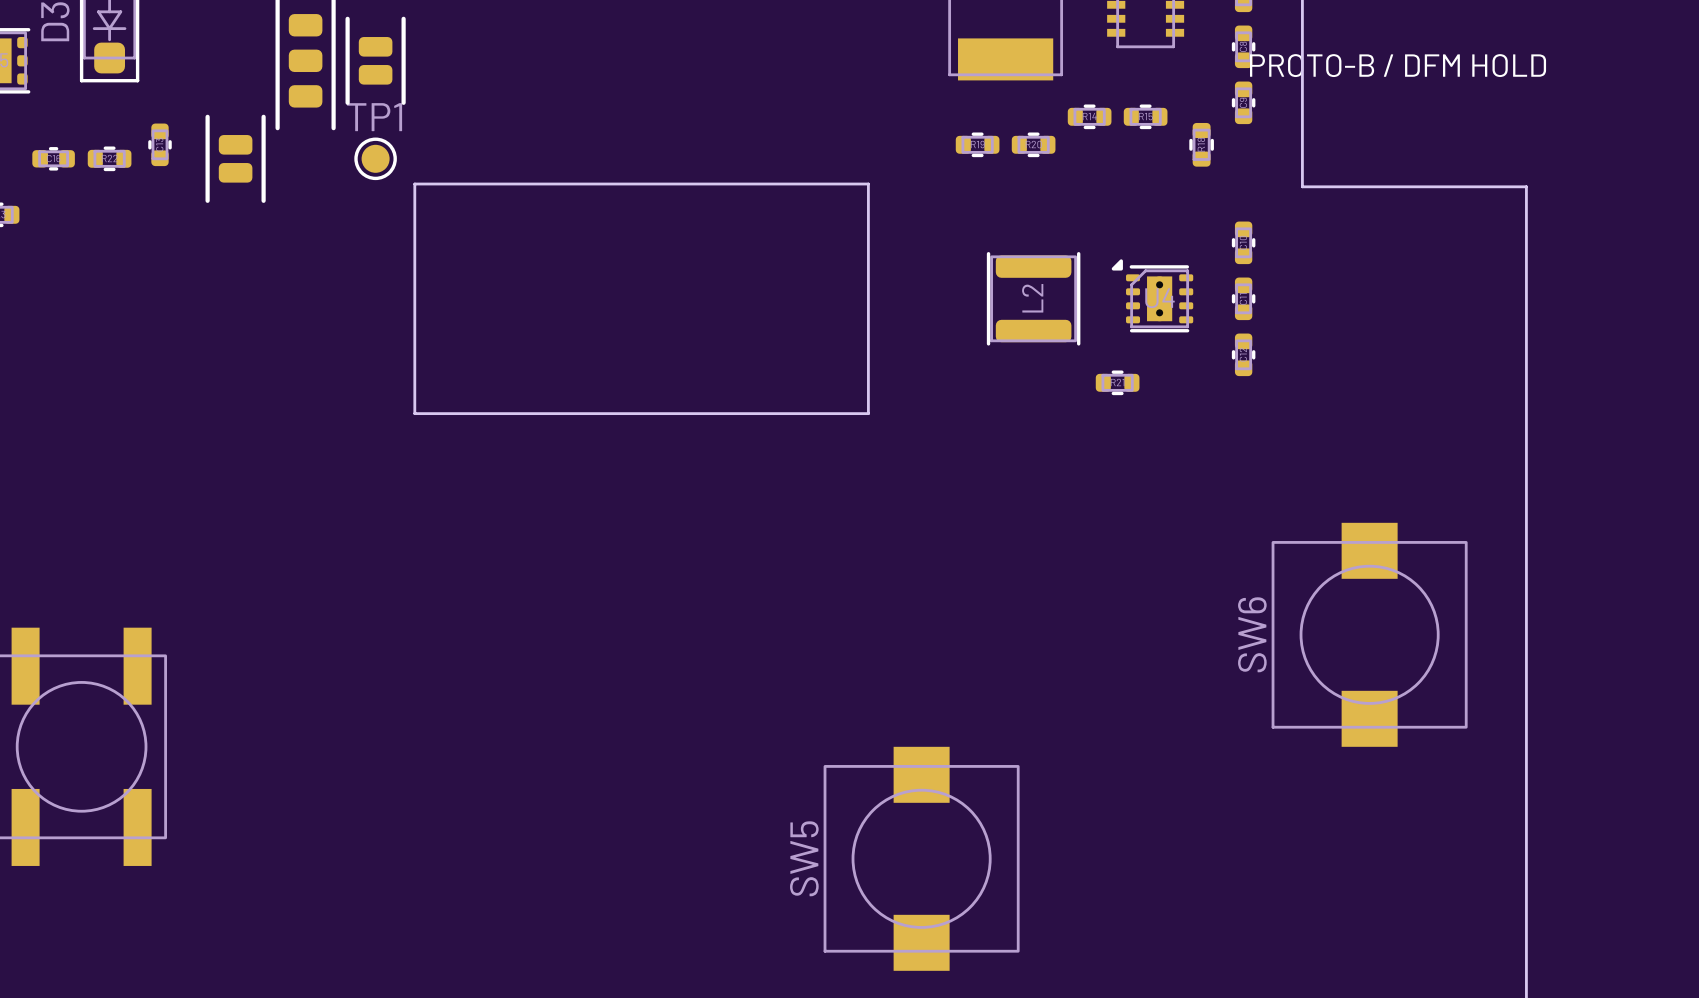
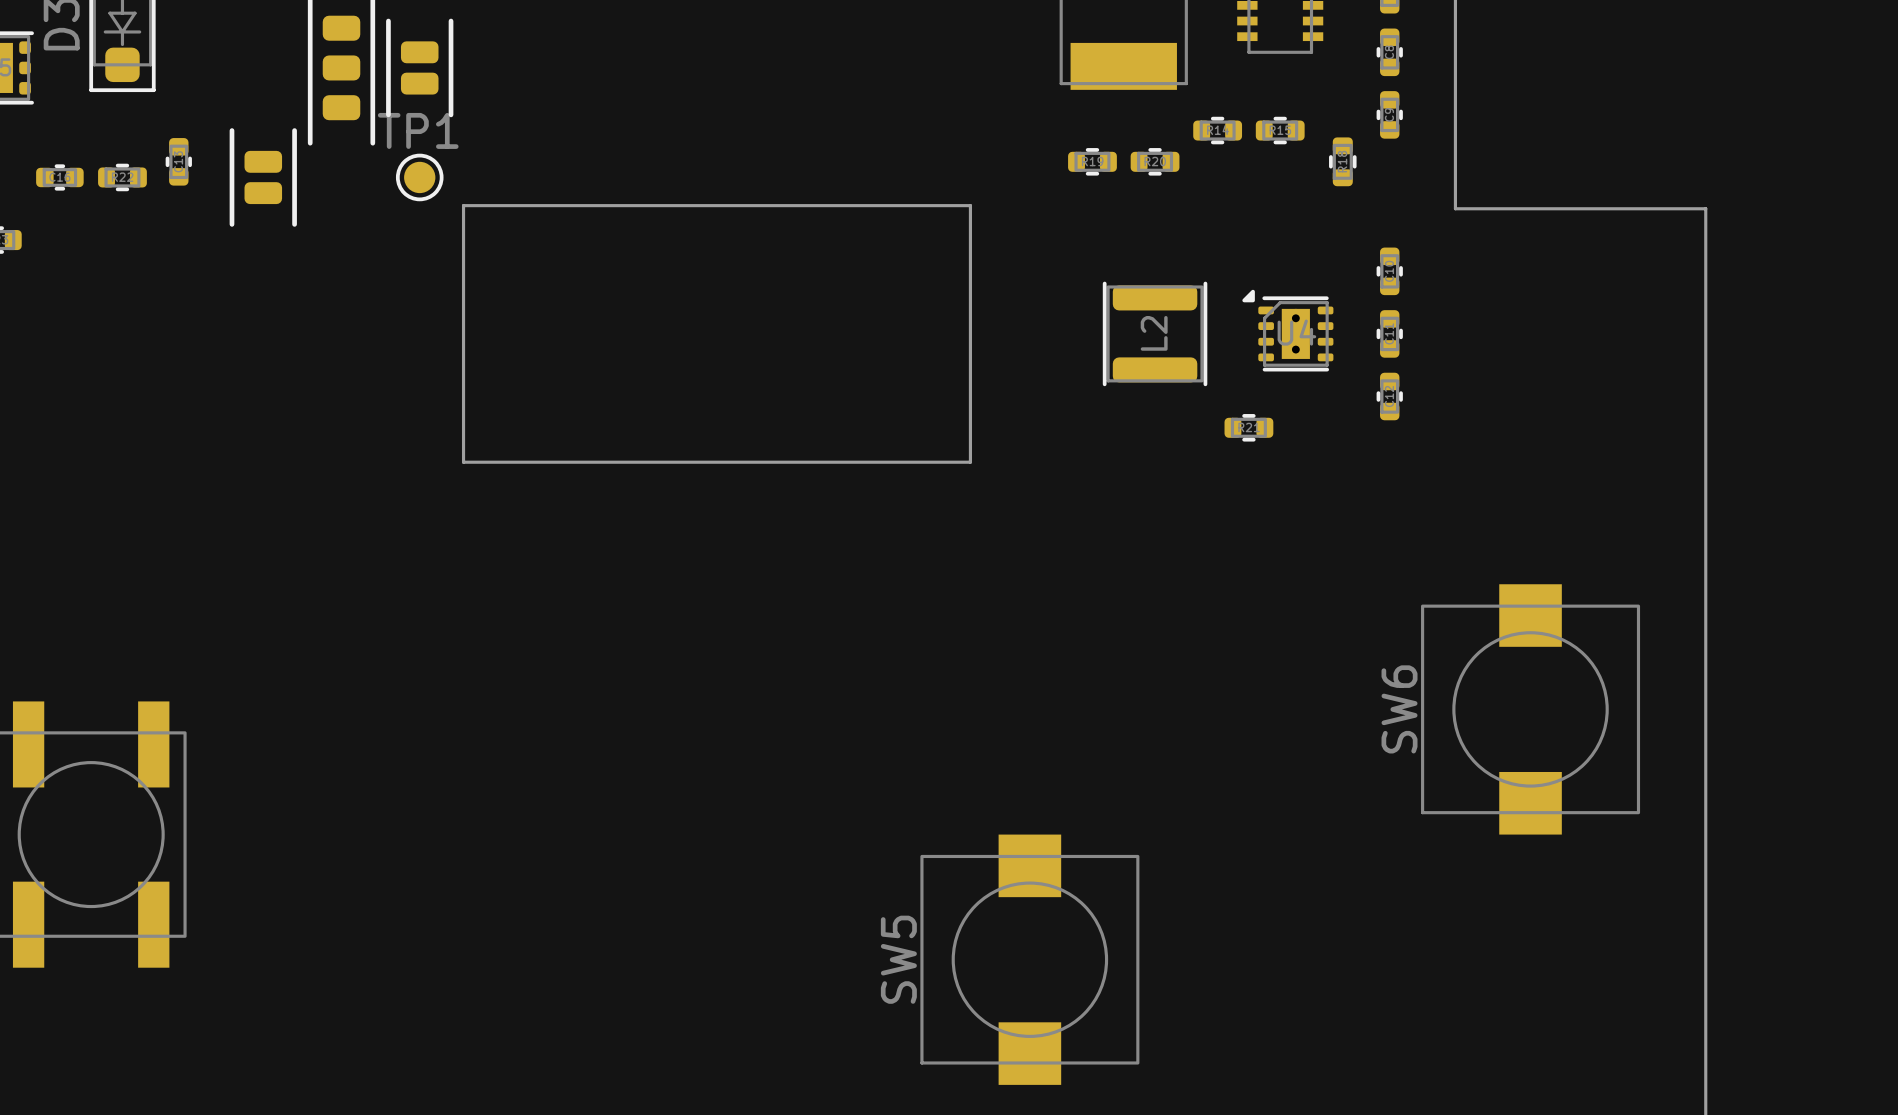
text: PROTO-B / DFM HOLD (1398, 65) -> none

